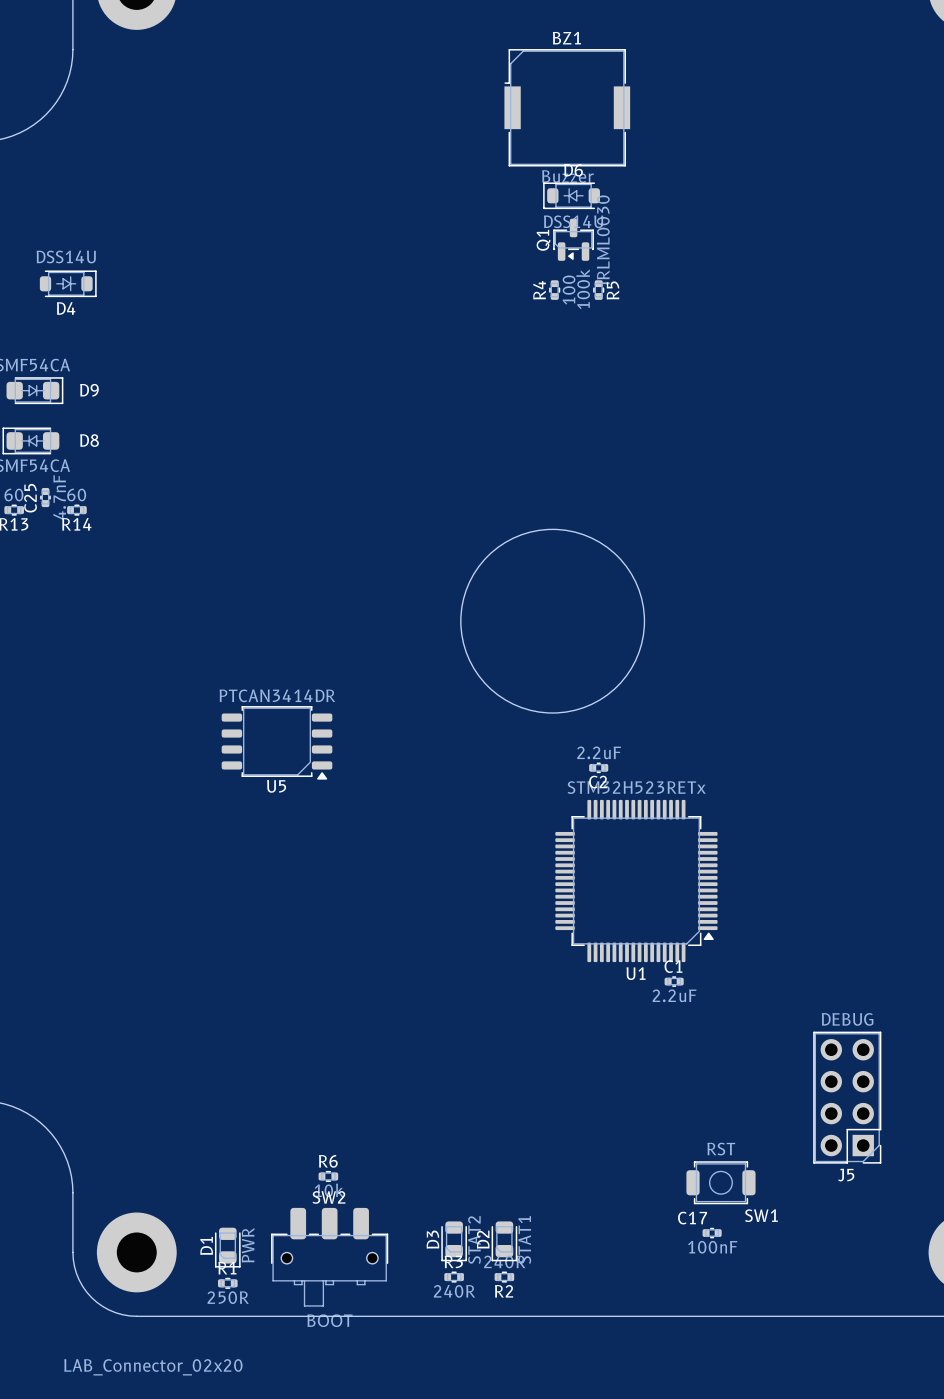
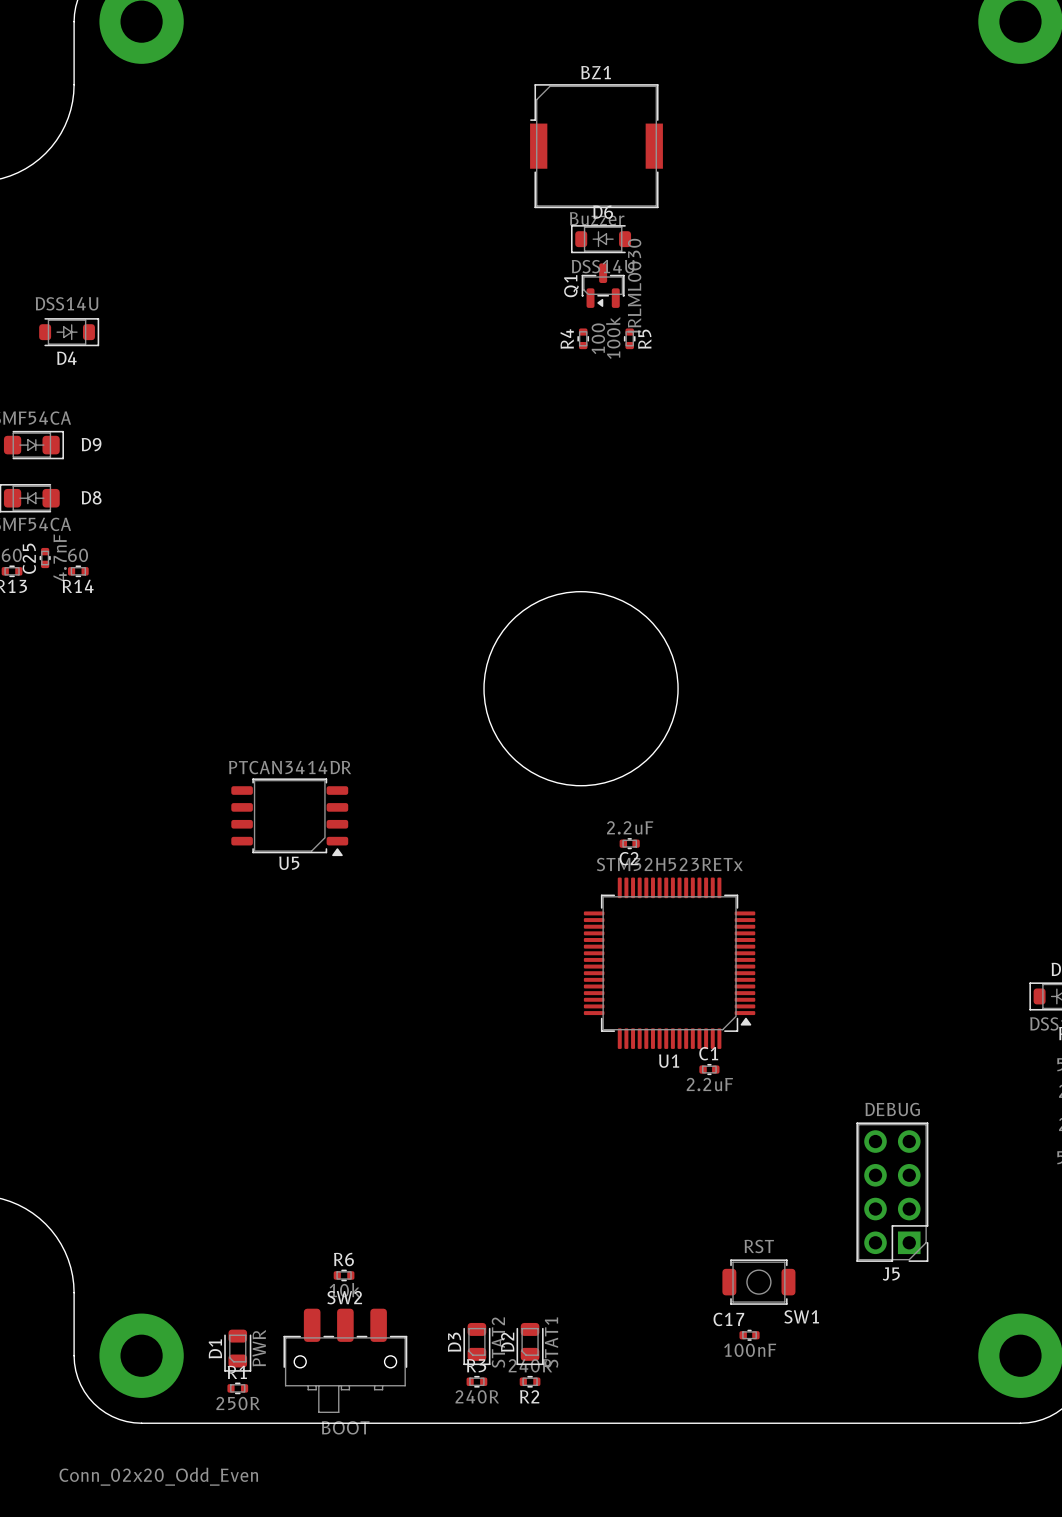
part value: LAB_Connector_02x20 (153, 1367) -> Conn_02x20_Odd_Even (158, 1476)

